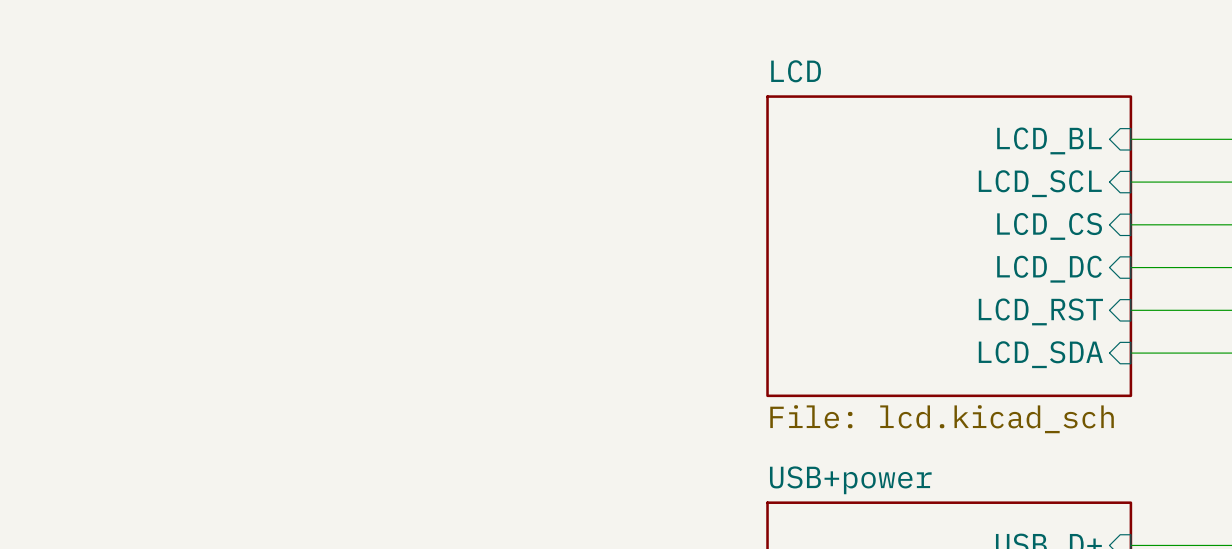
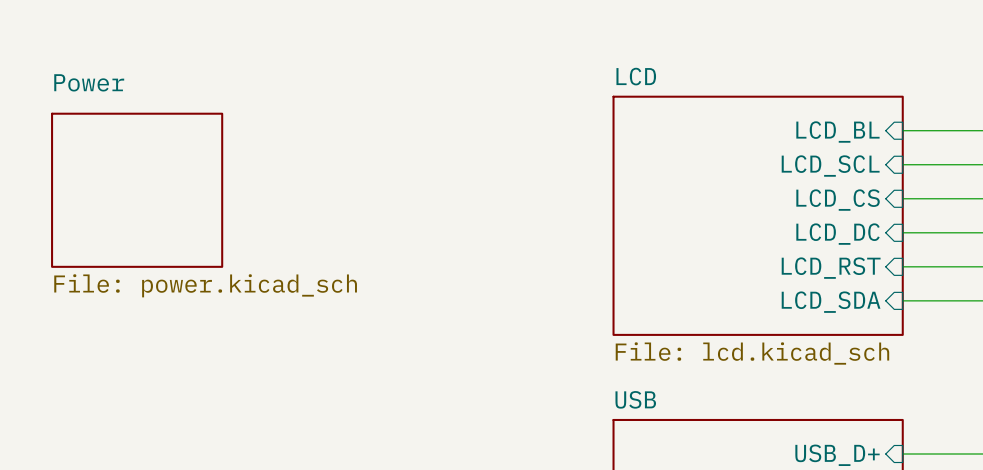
sheet Power: none -> File: power.kicad_sch (137, 190)
sheet USB+power name: USB+power (850, 480) -> USB (635, 399)

